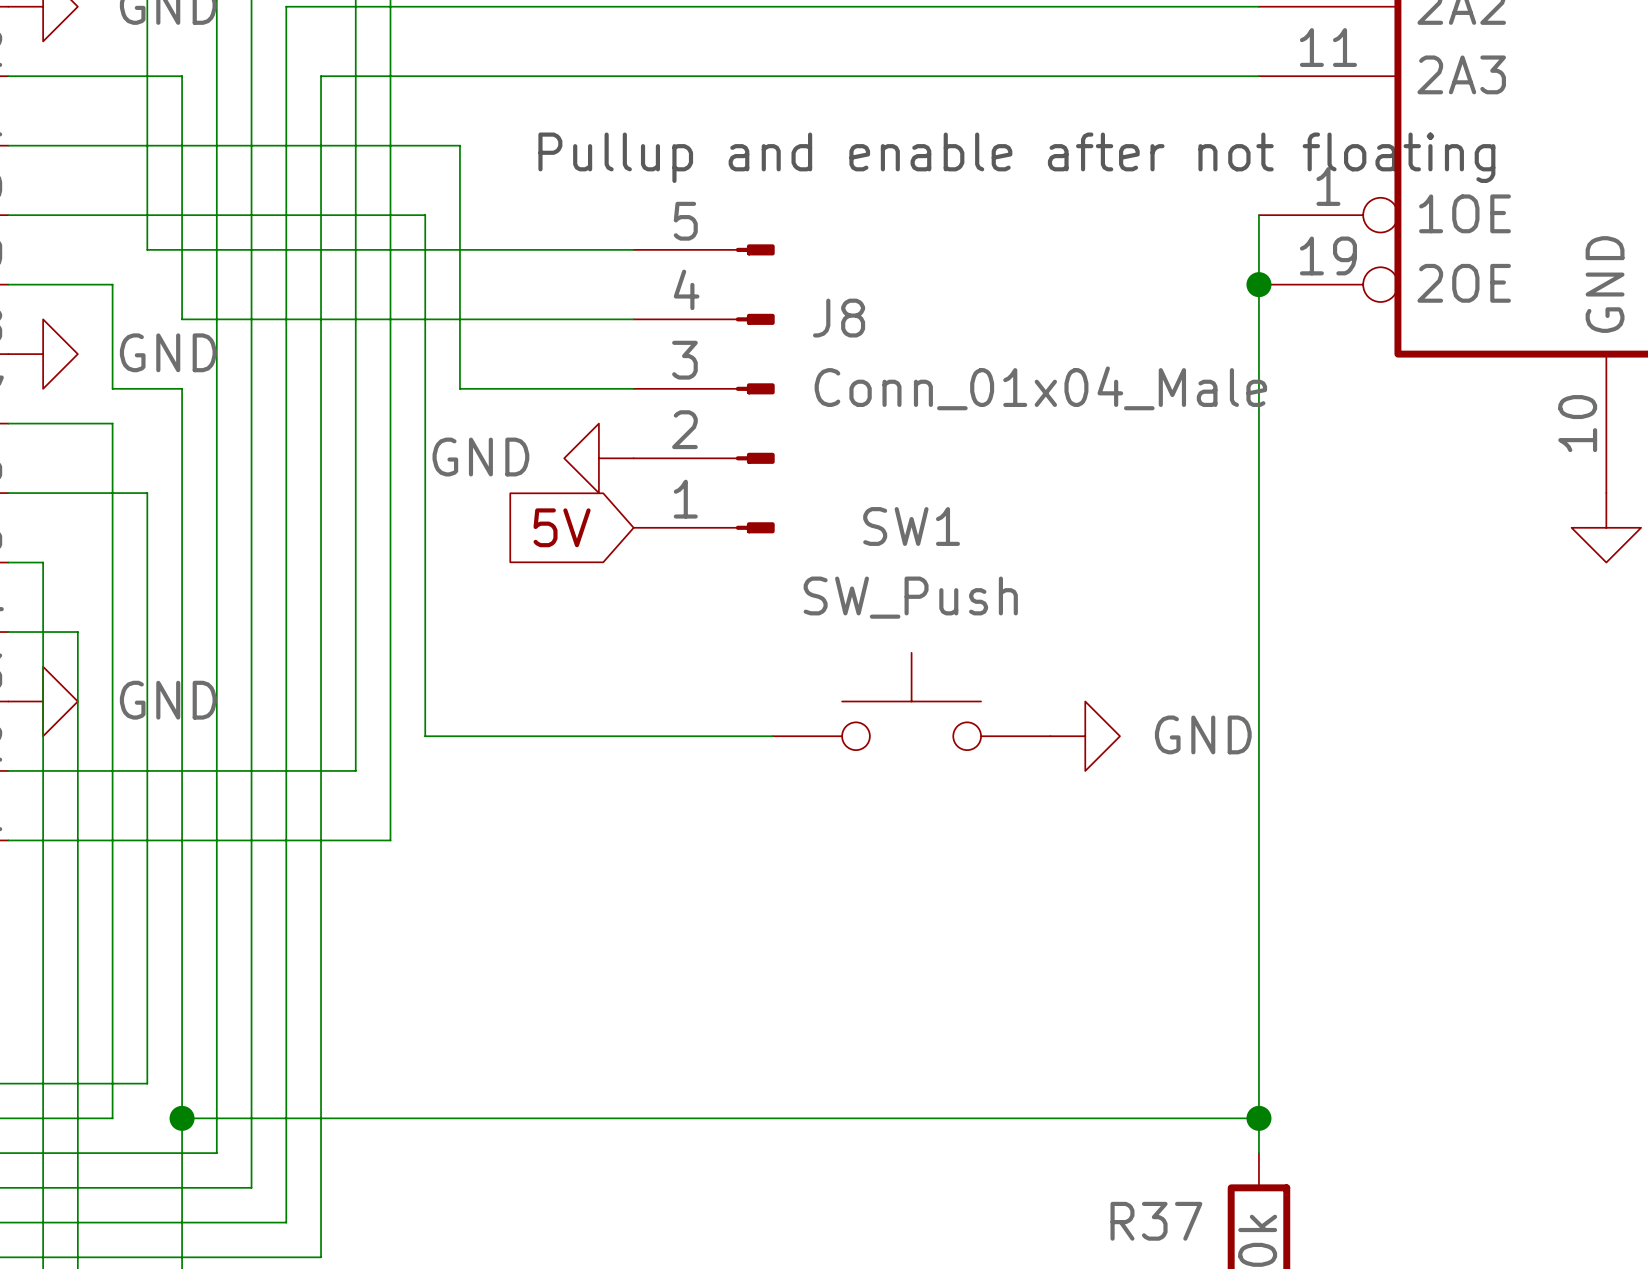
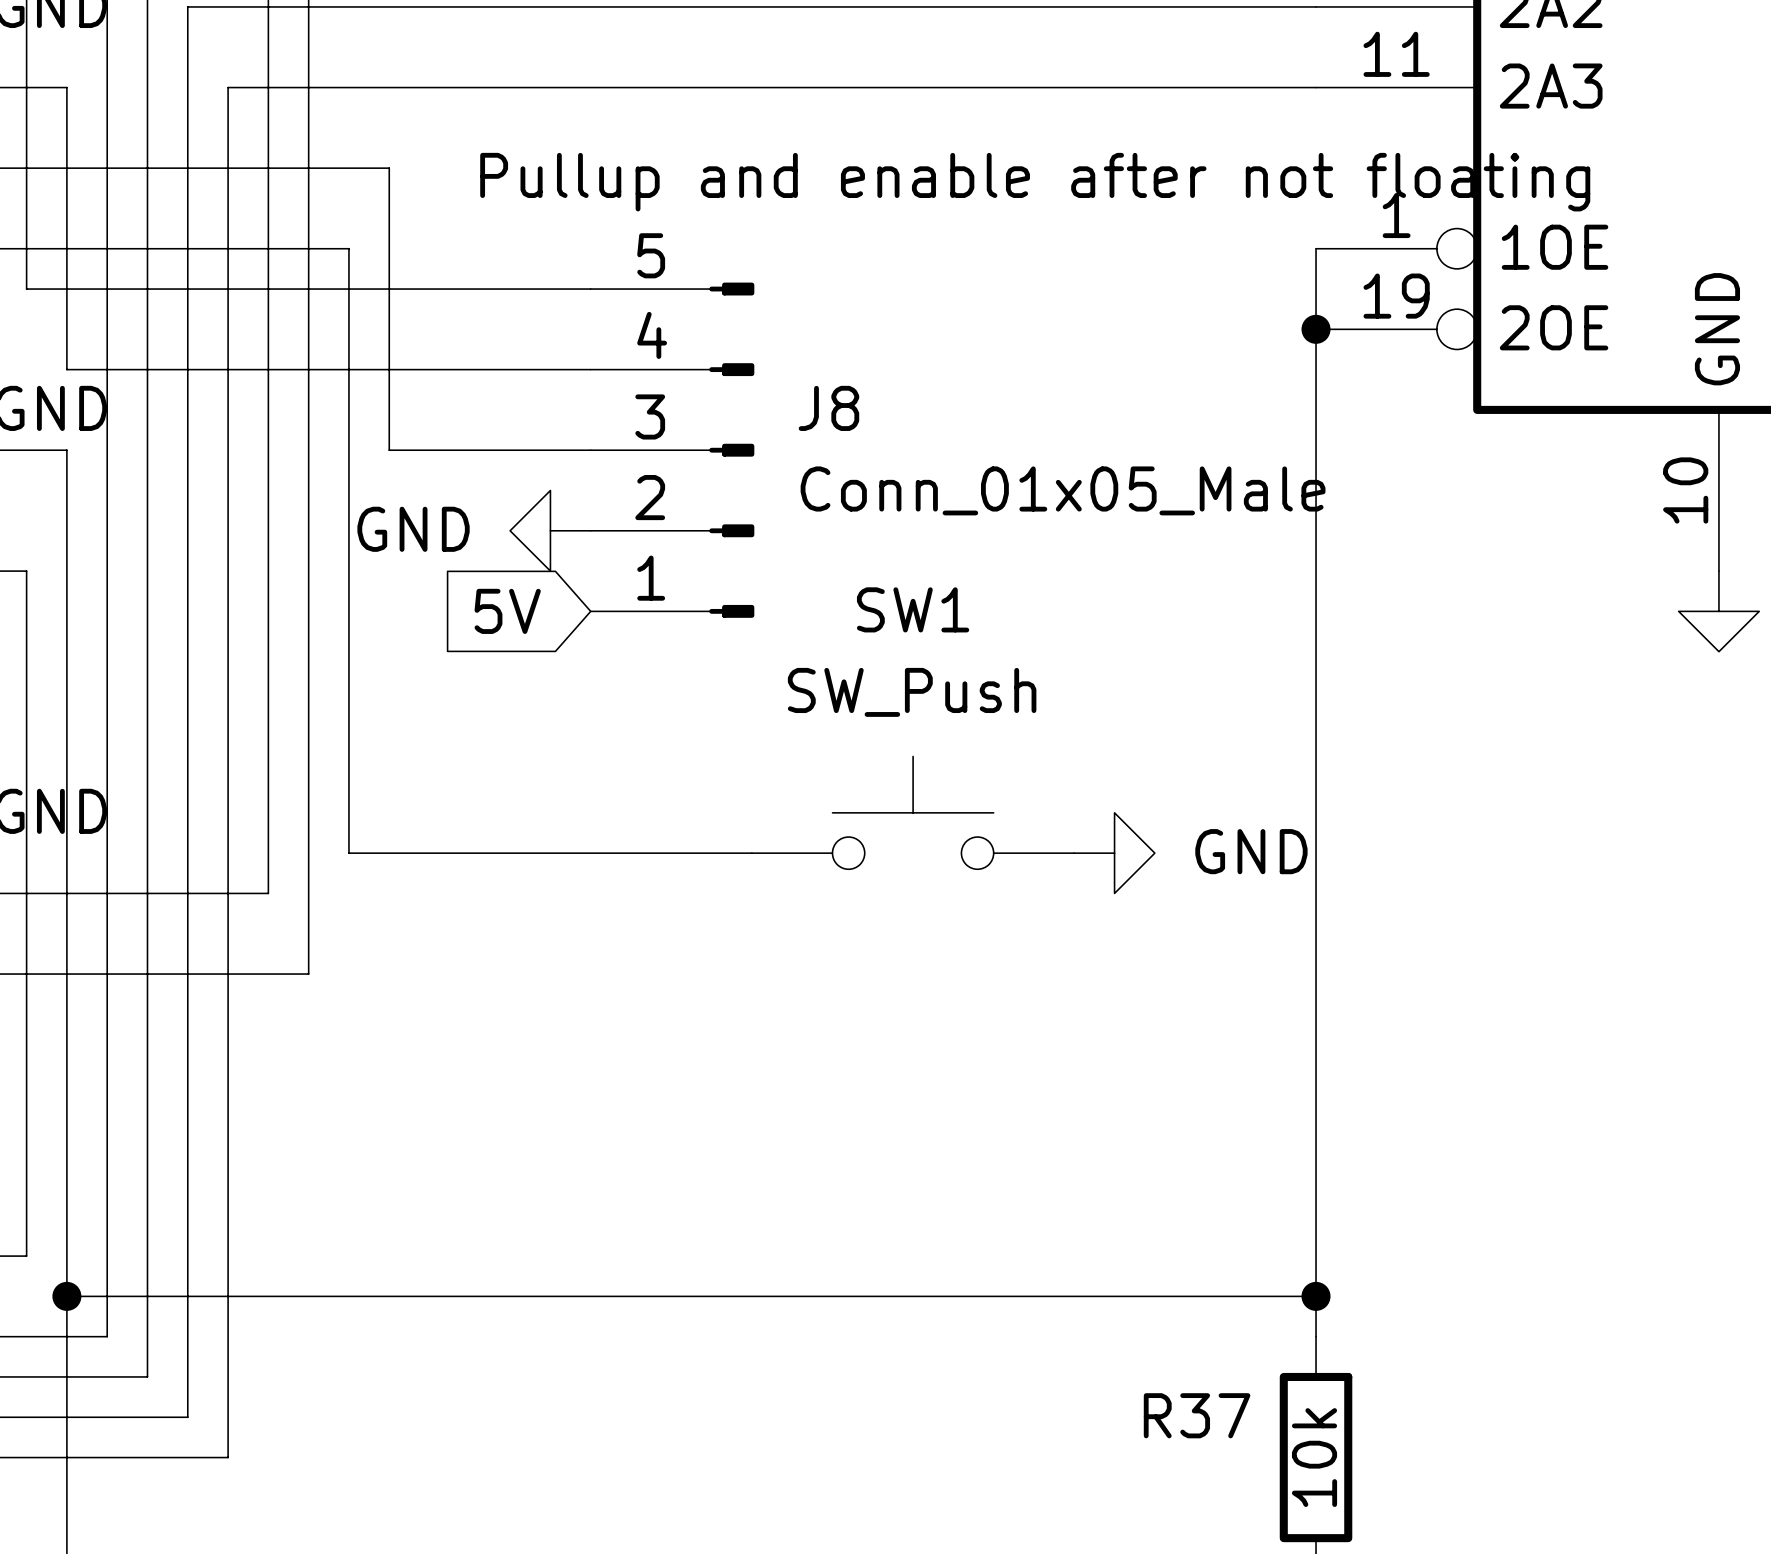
J8 name position: J8 (839, 318) -> J8 (828, 408)
J8 value: Conn_01x04_Male (1040, 388) -> Conn_01x05_Male (1063, 490)

